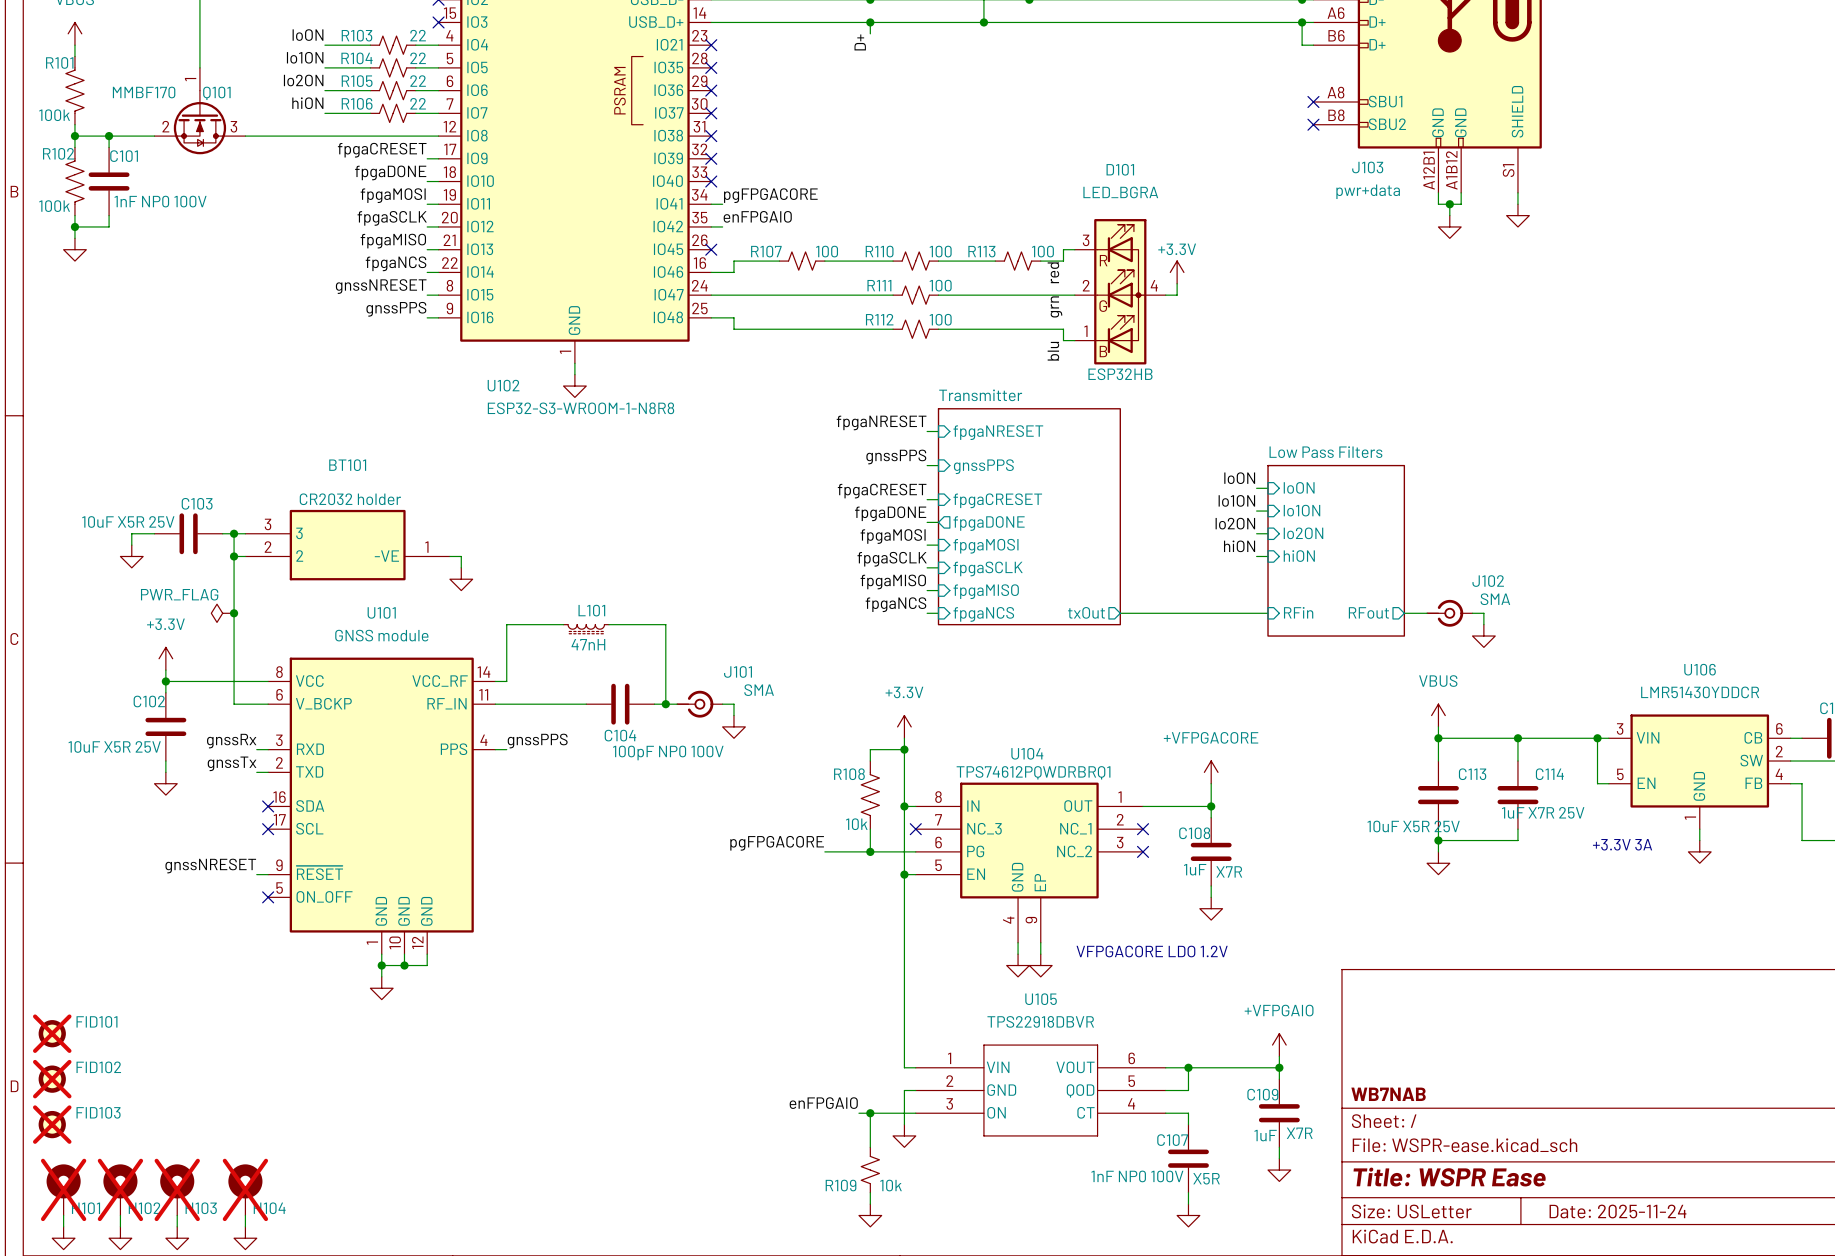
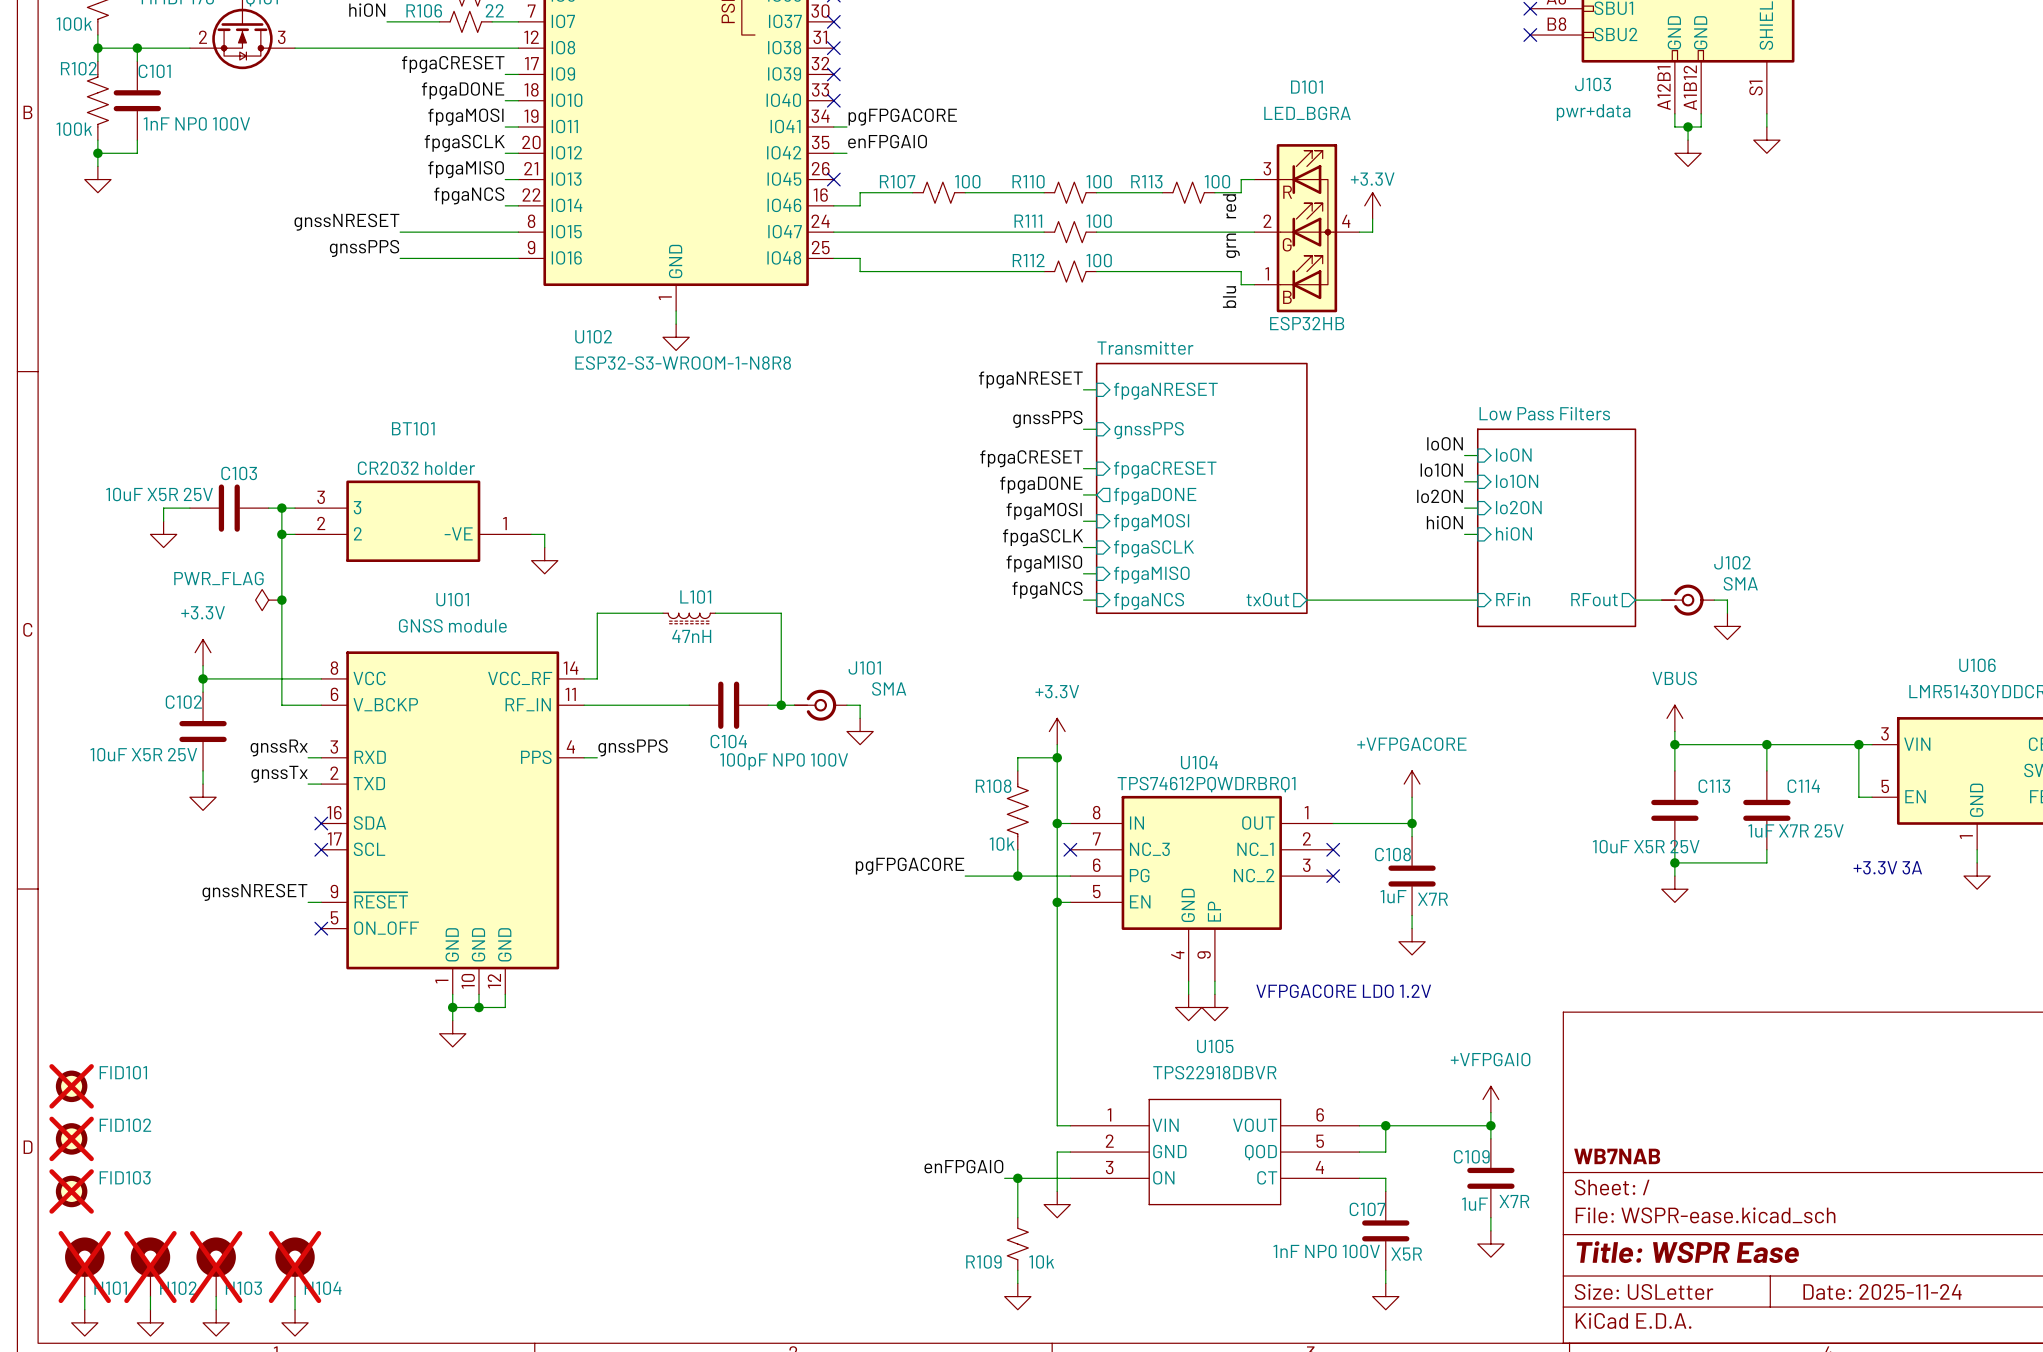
label position: gnssNRESET (381, 286) -> gnssNRESET (346, 222)
wire: none -> (400, 232) (505, 232)
label position: gnssPPS (396, 309) -> gnssPPS (364, 248)
wire: none -> (400, 258) (505, 258)

